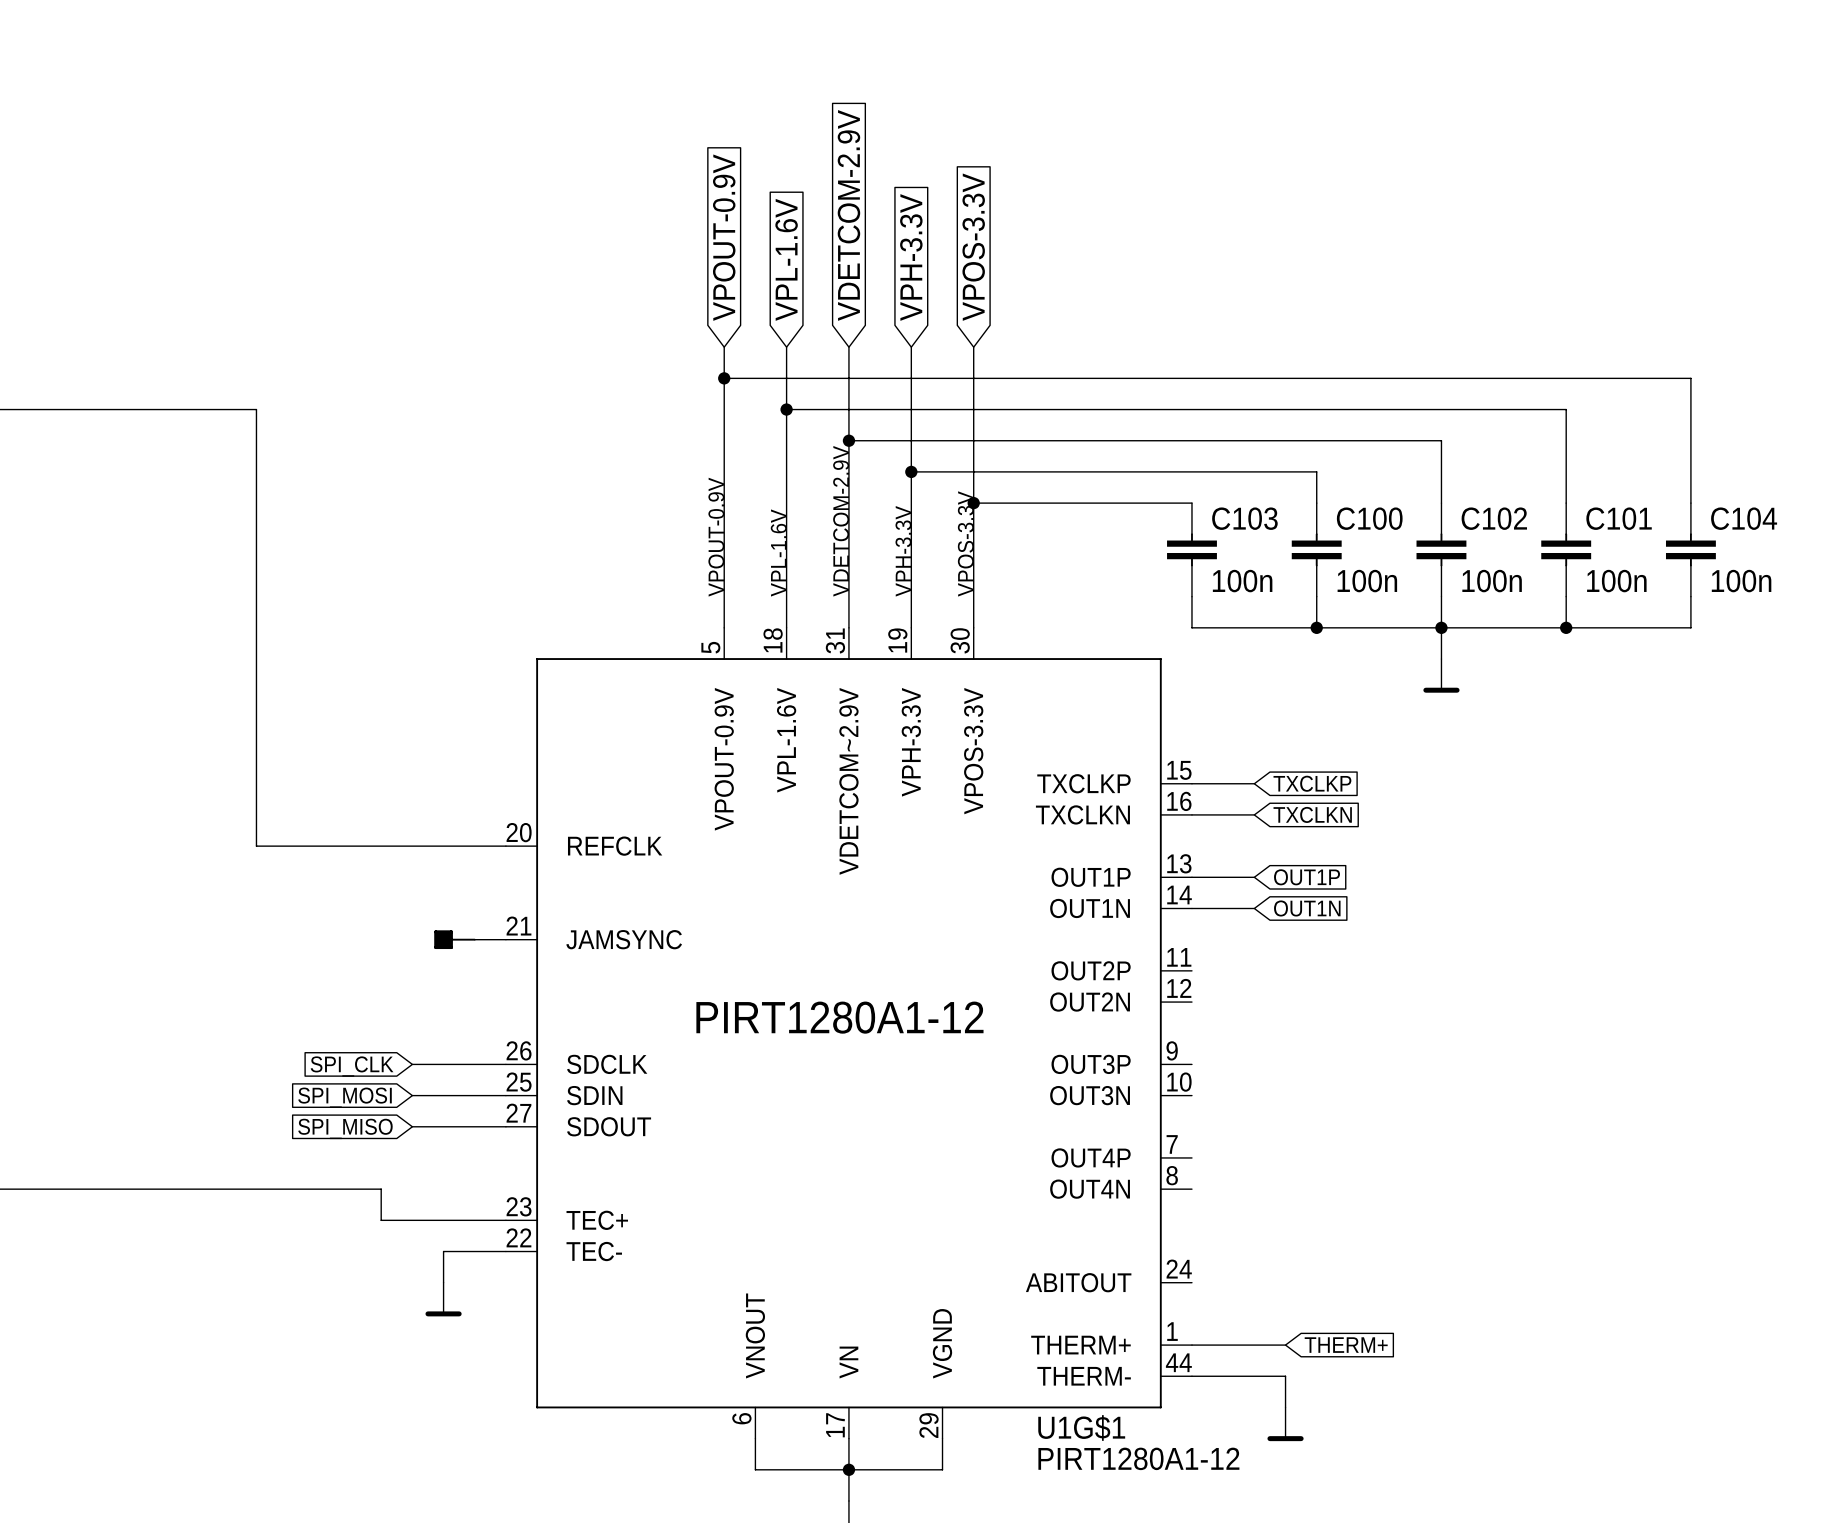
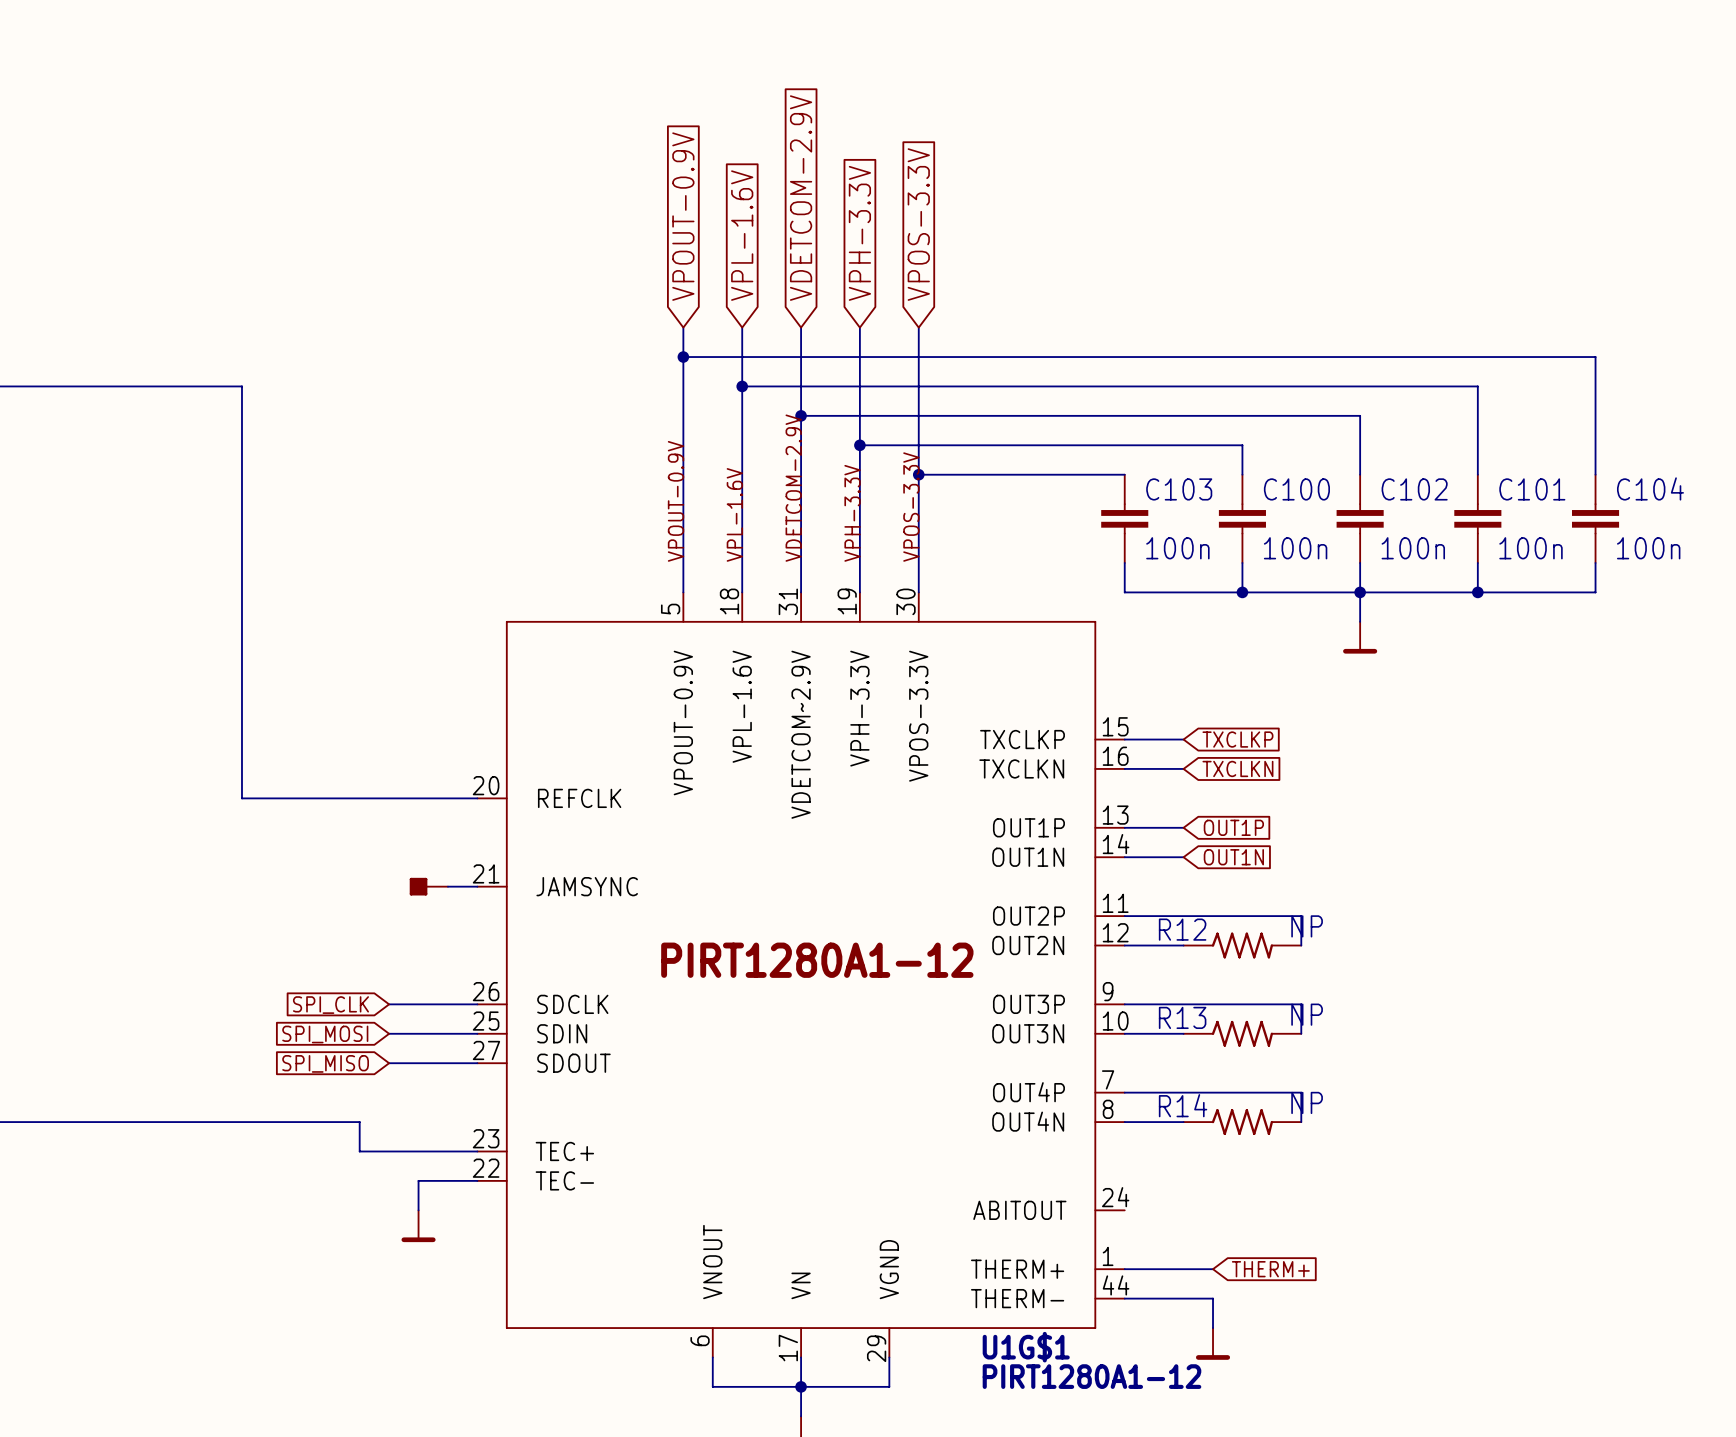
wire: none -> (1124, 916) (1301, 916) (1301, 945)
wire: none -> (1124, 945) (1183, 945)
R12: none -> NP (1242, 945)
wire: none -> (1124, 1004) (1301, 1004) (1301, 1033)
wire: none -> (1124, 1033) (1183, 1033)
R13: none -> NP (1242, 1033)
wire: none -> (1124, 1092) (1301, 1092) (1301, 1122)
wire: none -> (1124, 1122) (1183, 1122)
R14: none -> NP (1242, 1122)

